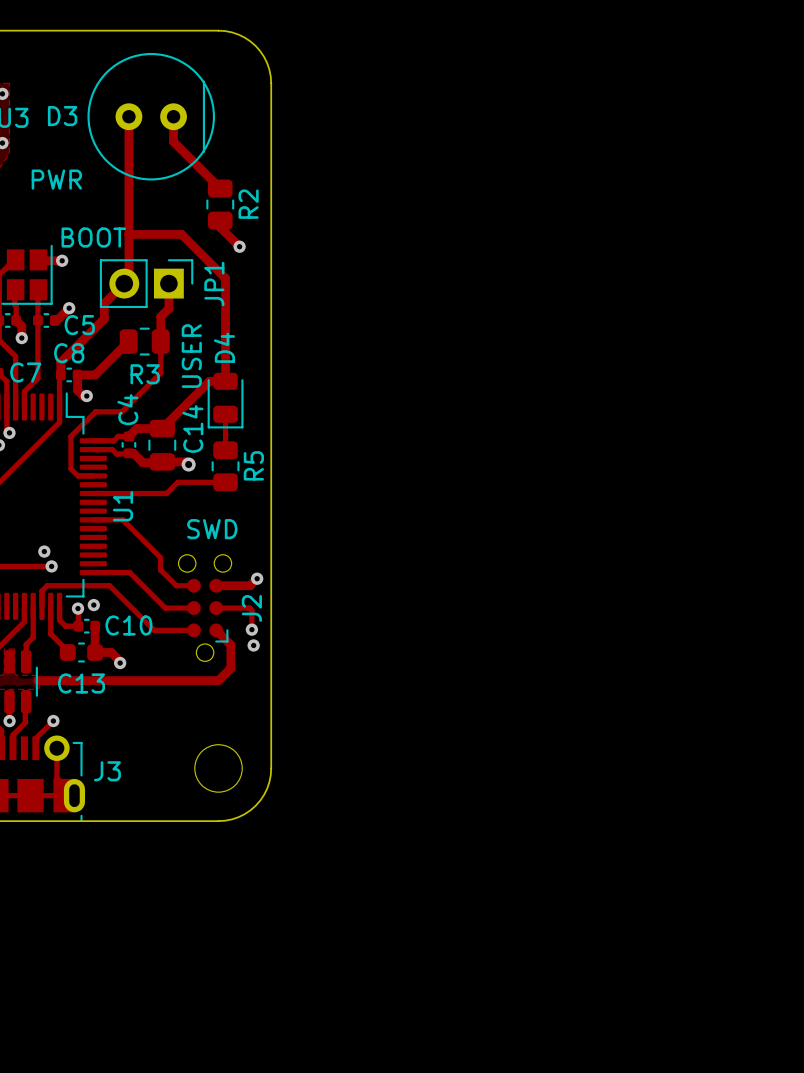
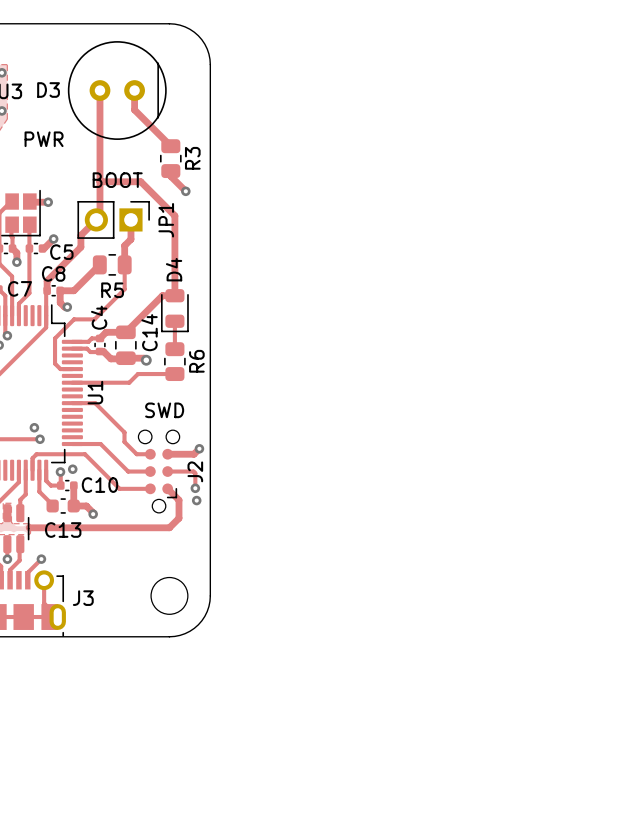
R2 name: R2 (248, 204) -> R3 (192, 158)
text position: BOOT (93, 237) -> BOOT (117, 180)
text: USER (191, 356) -> none
R3 name: R3 (145, 374) -> R5 (112, 290)
R5 name: R5 (253, 465) -> R6 (196, 361)

